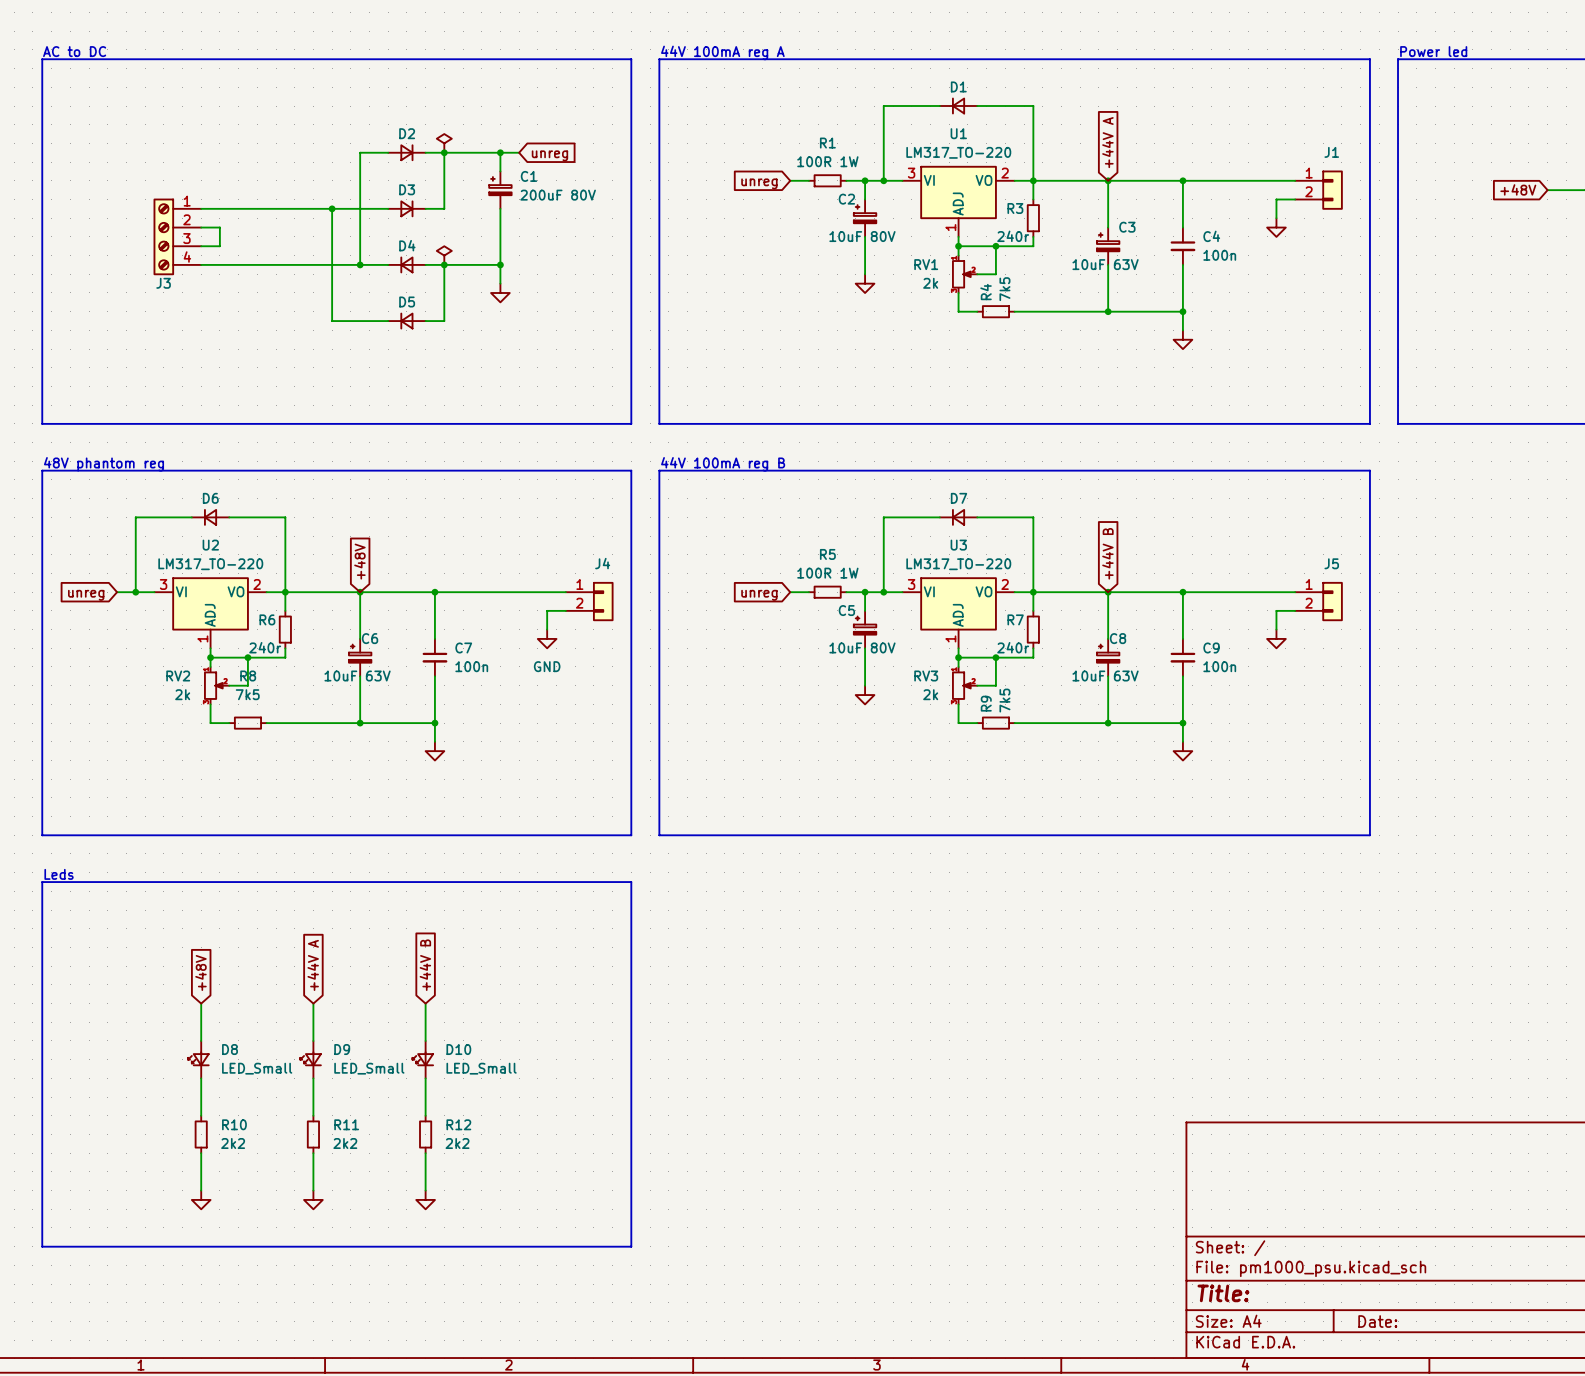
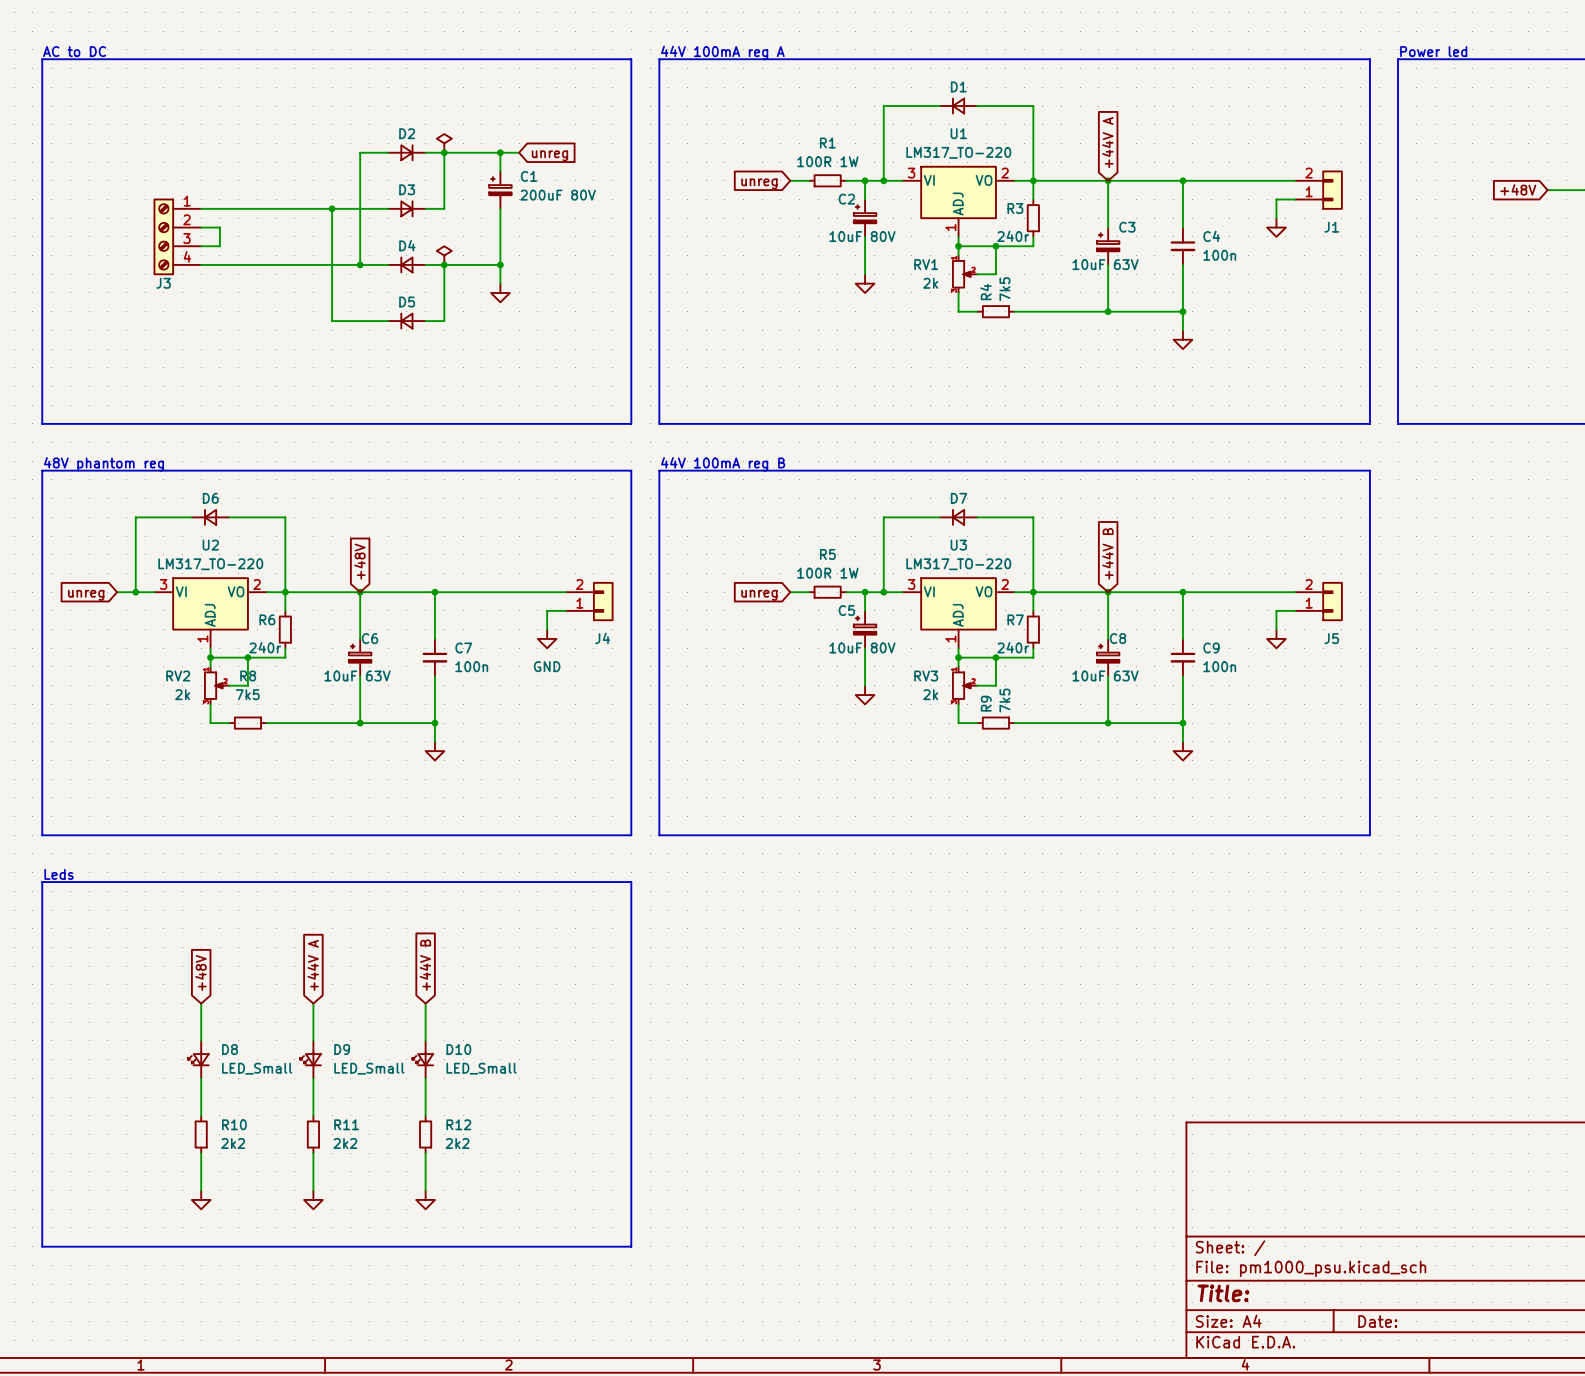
J1 flip: as is (1332, 190) -> up-down (1332, 190)
J4 flip: as is (603, 601) -> up-down (603, 601)
J5 flip: as is (1332, 601) -> up-down (1332, 601)

